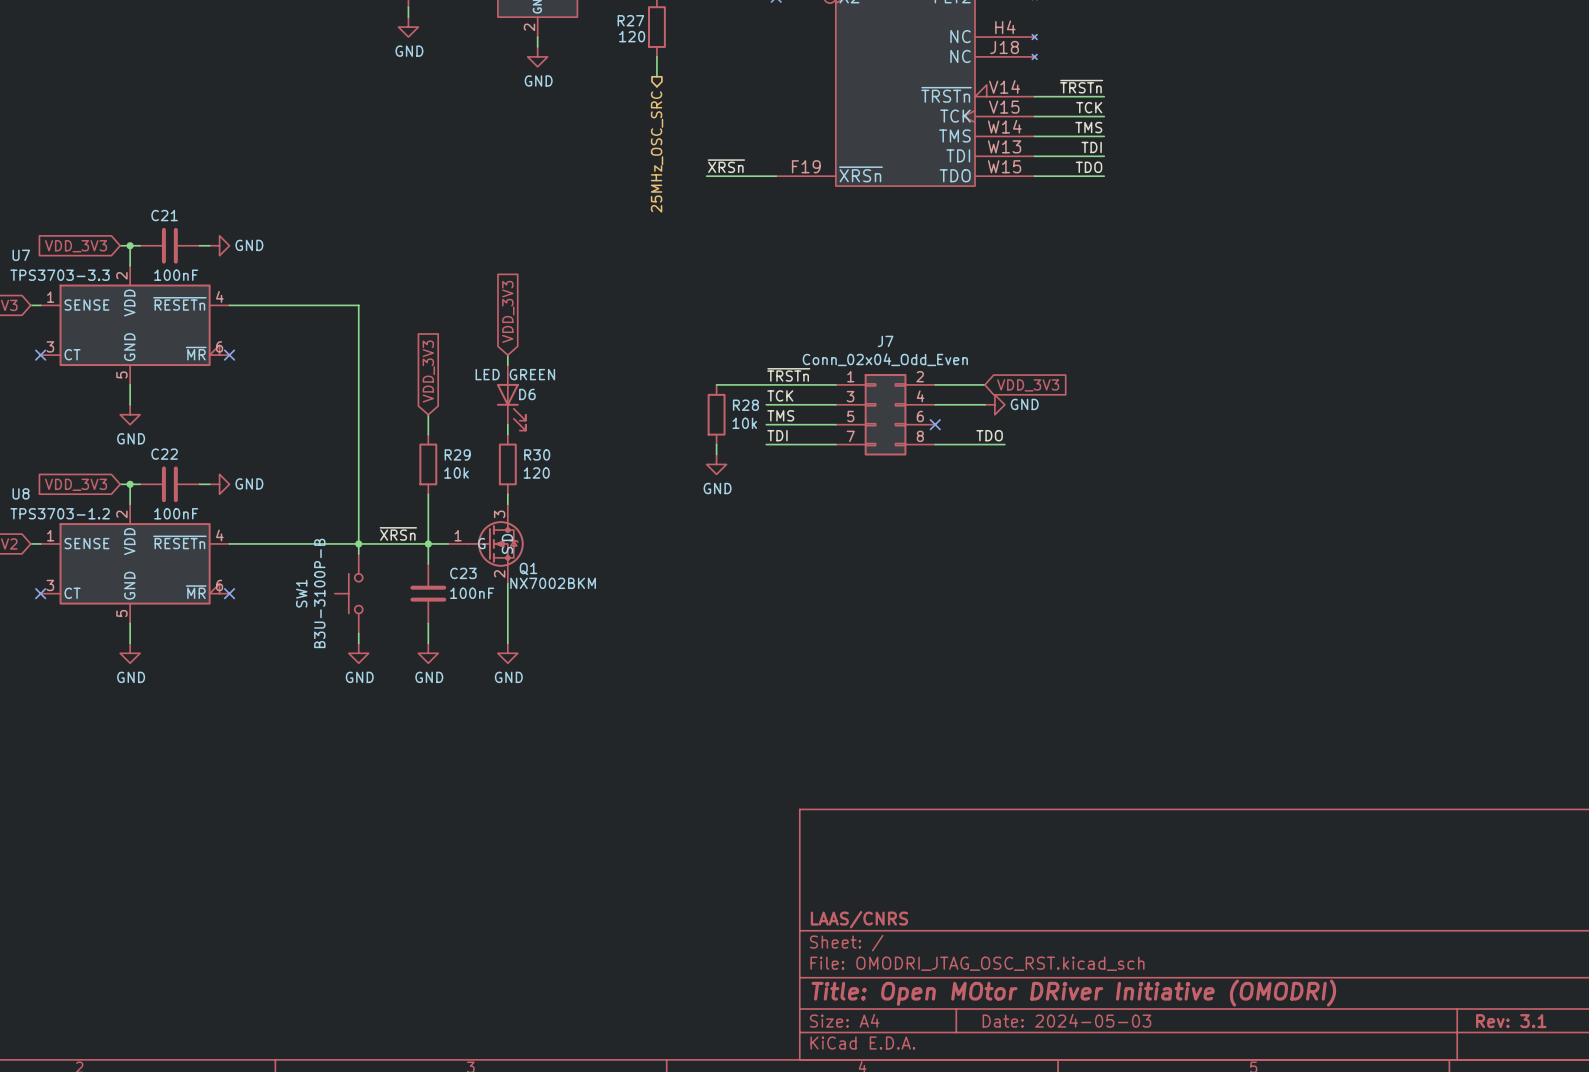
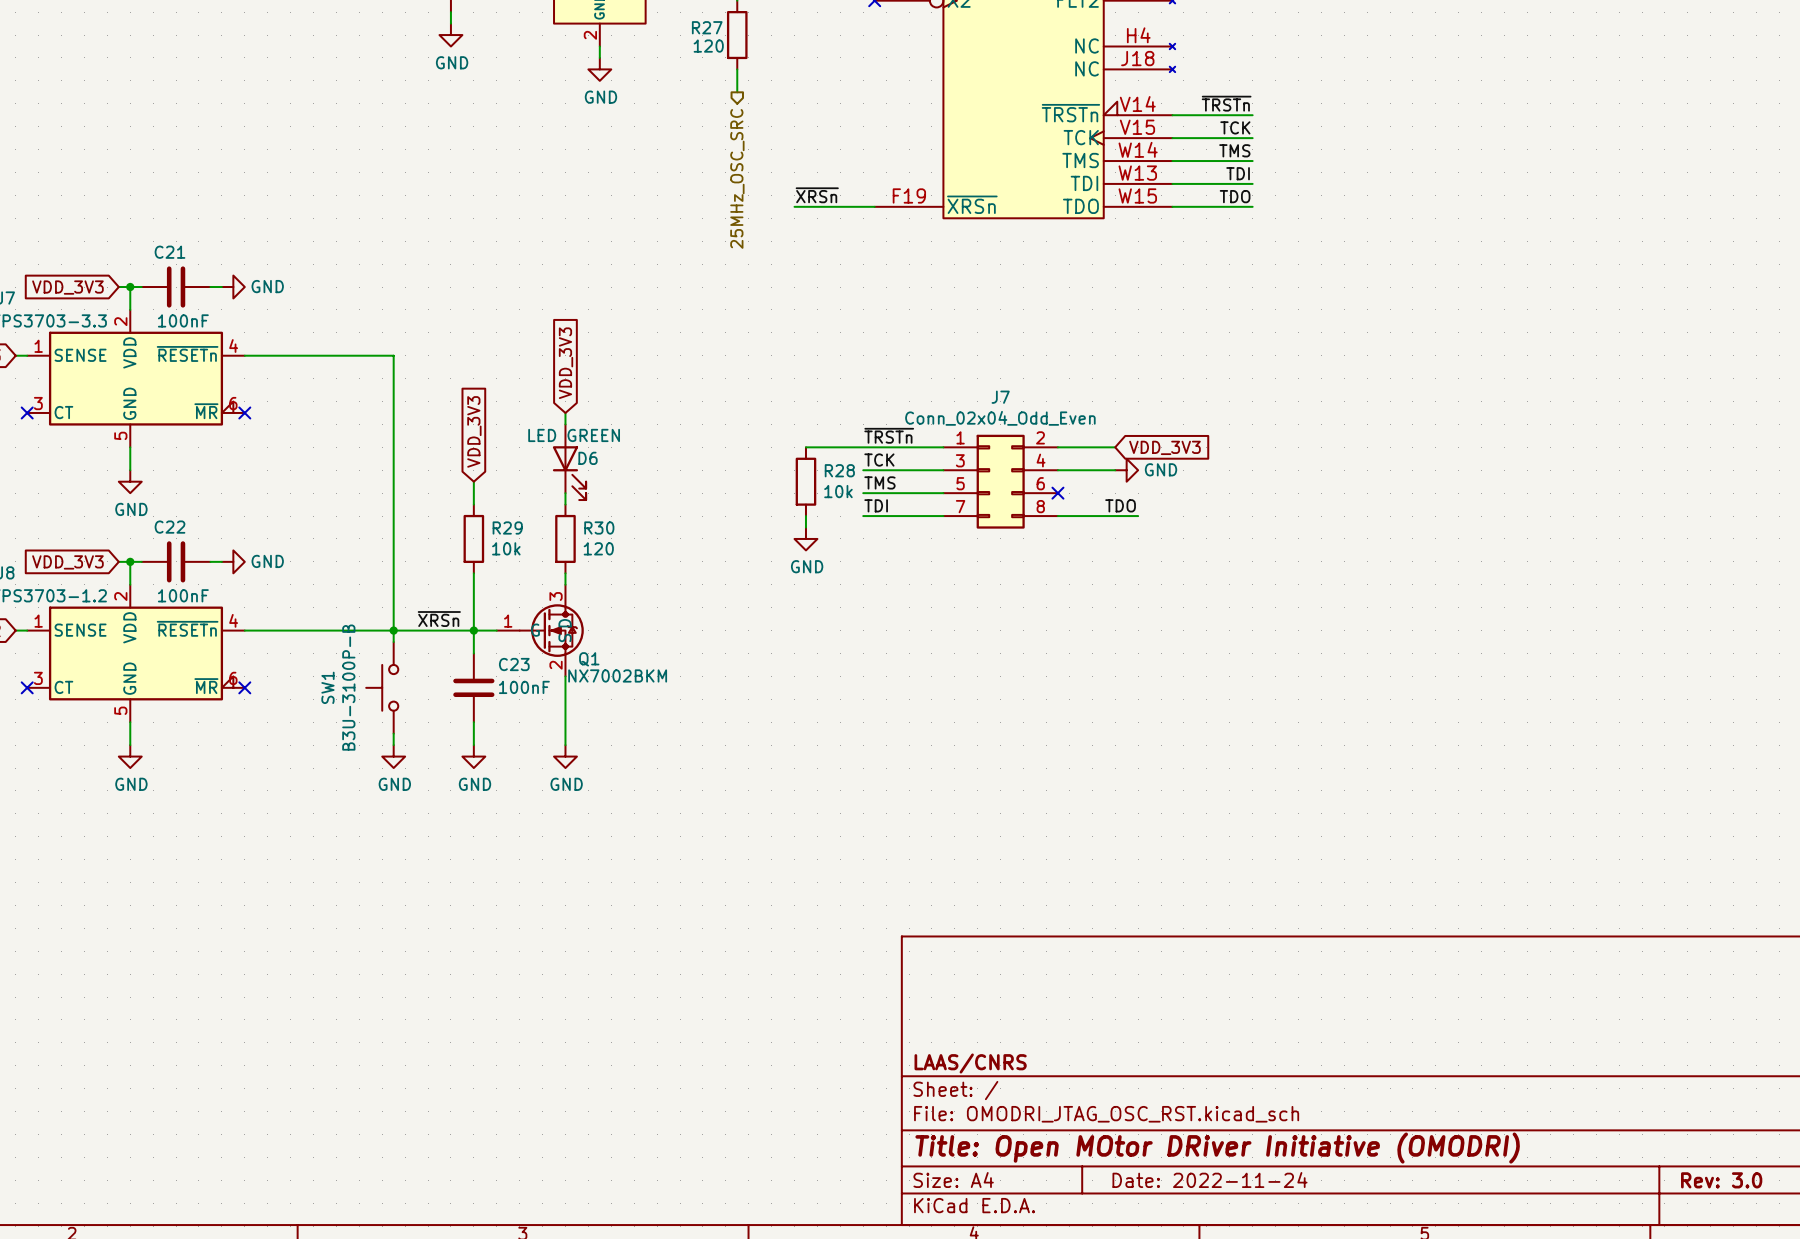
title block: Date: 2024-05-03 (1066, 1020) -> Date: 2022-11-24 (1209, 1180)
title block: Rev: 3.1 (1511, 1021) -> Rev: 3.0 (1721, 1180)

